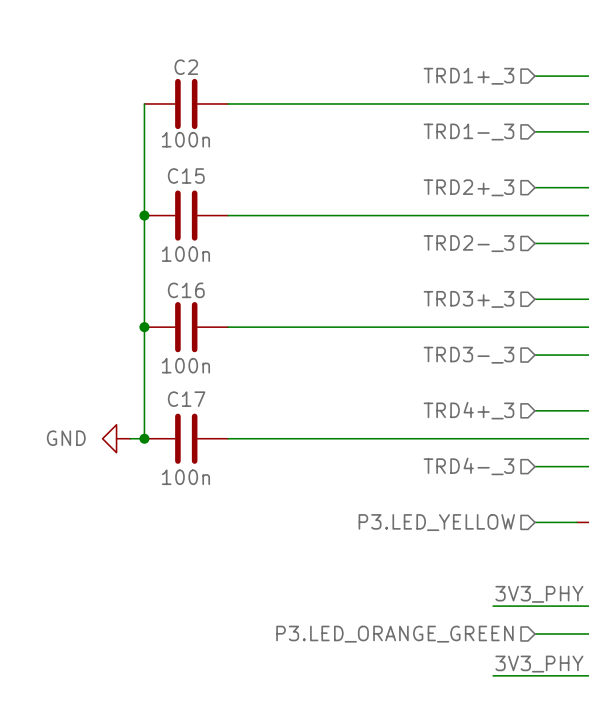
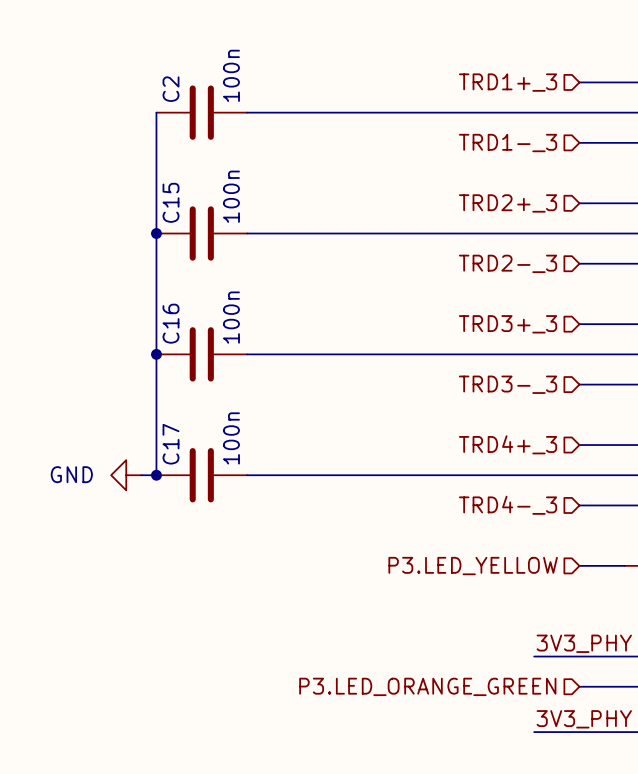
C2 name rotation: 0° (186, 67) -> 90° counterclockwise (171, 89)
C2 value rotation: 0° (185, 139) -> 90° counterclockwise (231, 75)
C2 value position: 100n (185, 139) -> 100n (231, 75)
C15 name rotation: 0° (186, 176) -> 90° counterclockwise (171, 202)
C15 value rotation: 0° (185, 254) -> 90° counterclockwise (231, 196)
C15 value position: 100n (185, 254) -> 100n (231, 196)
C16 name rotation: 0° (186, 290) -> 90° counterclockwise (171, 323)
C16 value rotation: 0° (185, 365) -> 90° counterclockwise (231, 317)
C16 value position: 100n (185, 365) -> 100n (231, 317)
C17 name rotation: 0° (186, 399) -> 90° counterclockwise (171, 444)
C17 value rotation: 0° (185, 477) -> 90° counterclockwise (231, 438)
C17 value position: 100n (185, 477) -> 100n (231, 438)

